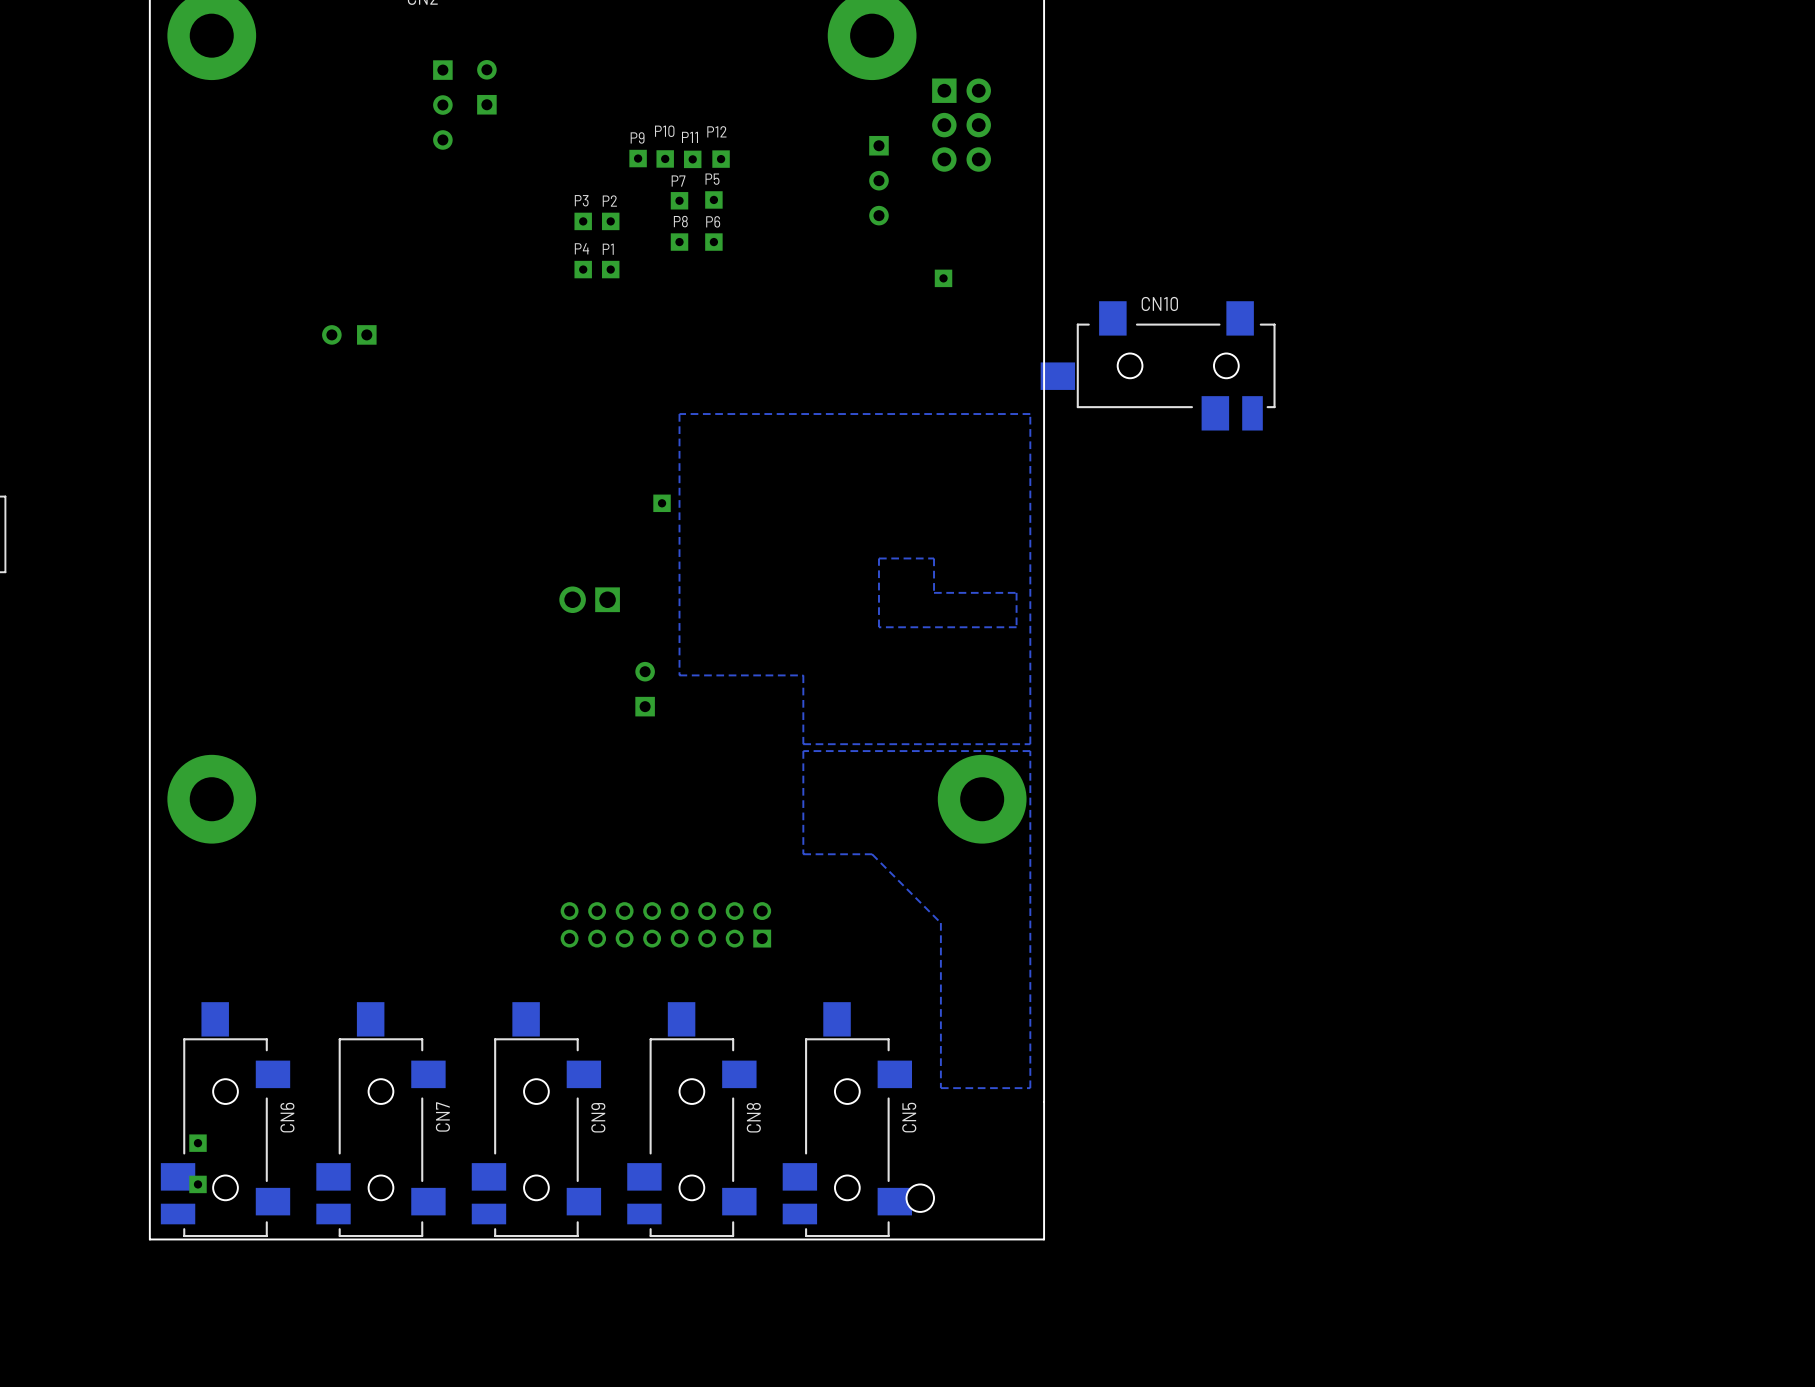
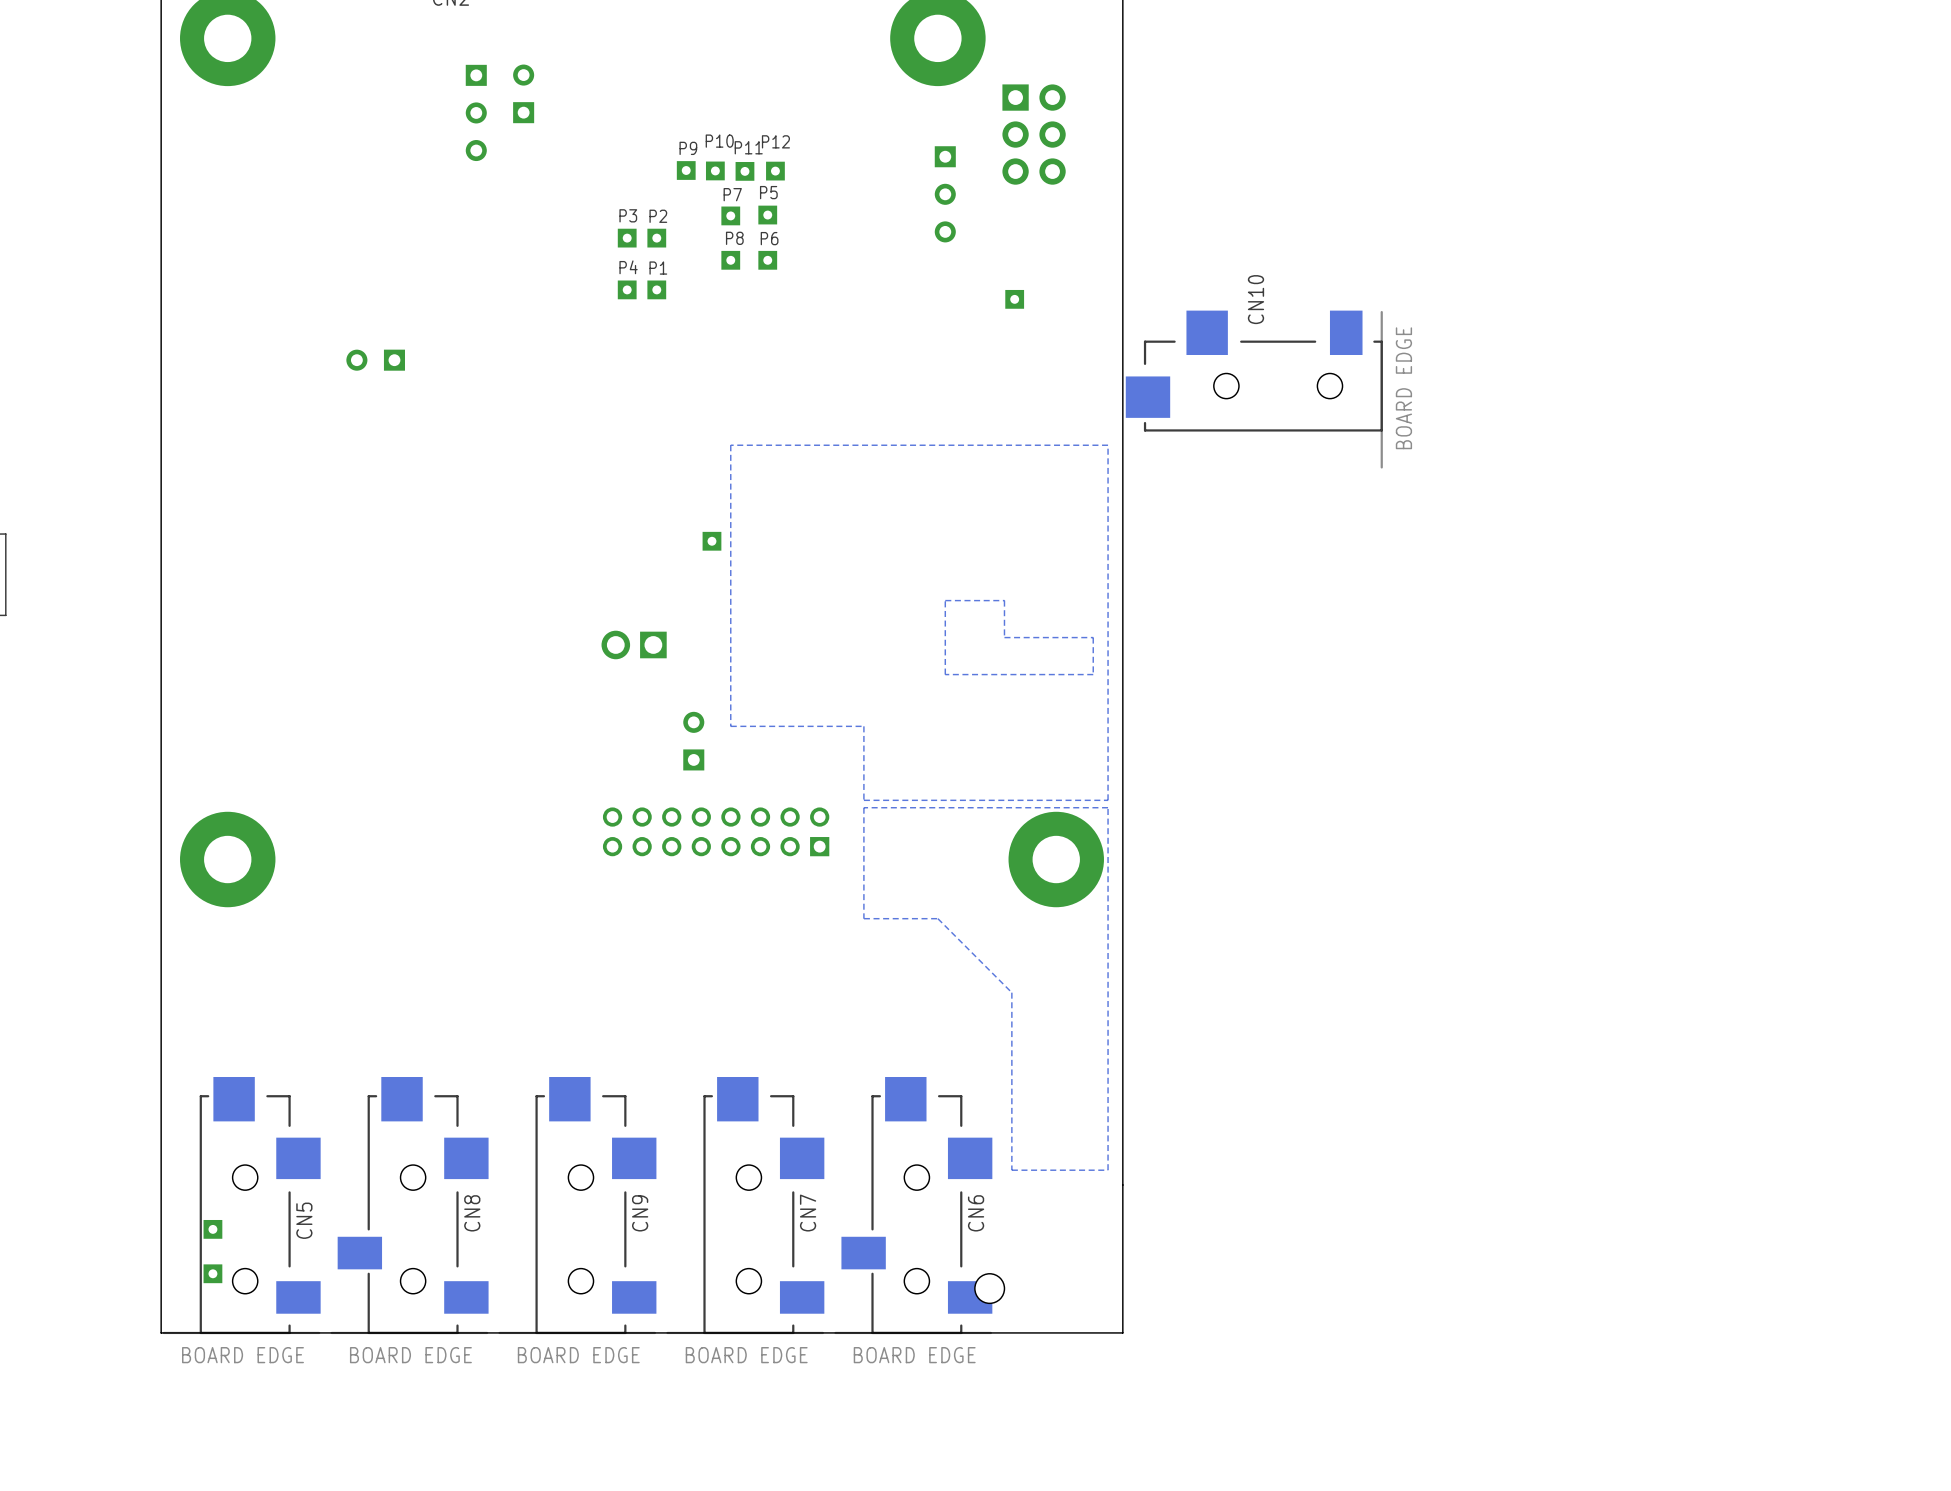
CN10 footprint: [1040, 301, 1276, 431] -> [1125, 310, 1383, 469]
part position: (665, 924) -> (716, 831)
CN6 footprint: [160, 1002, 291, 1238] -> [834, 1076, 993, 1335]
CN7 footprint: [316, 1002, 446, 1238] -> [666, 1076, 825, 1335]
CN9 footprint: [471, 1002, 602, 1238] -> [498, 1076, 657, 1335]
CN8 footprint: [627, 1002, 757, 1238] -> [330, 1076, 489, 1335]
CN5 footprint: [782, 1002, 913, 1238] -> [162, 1076, 321, 1335]

